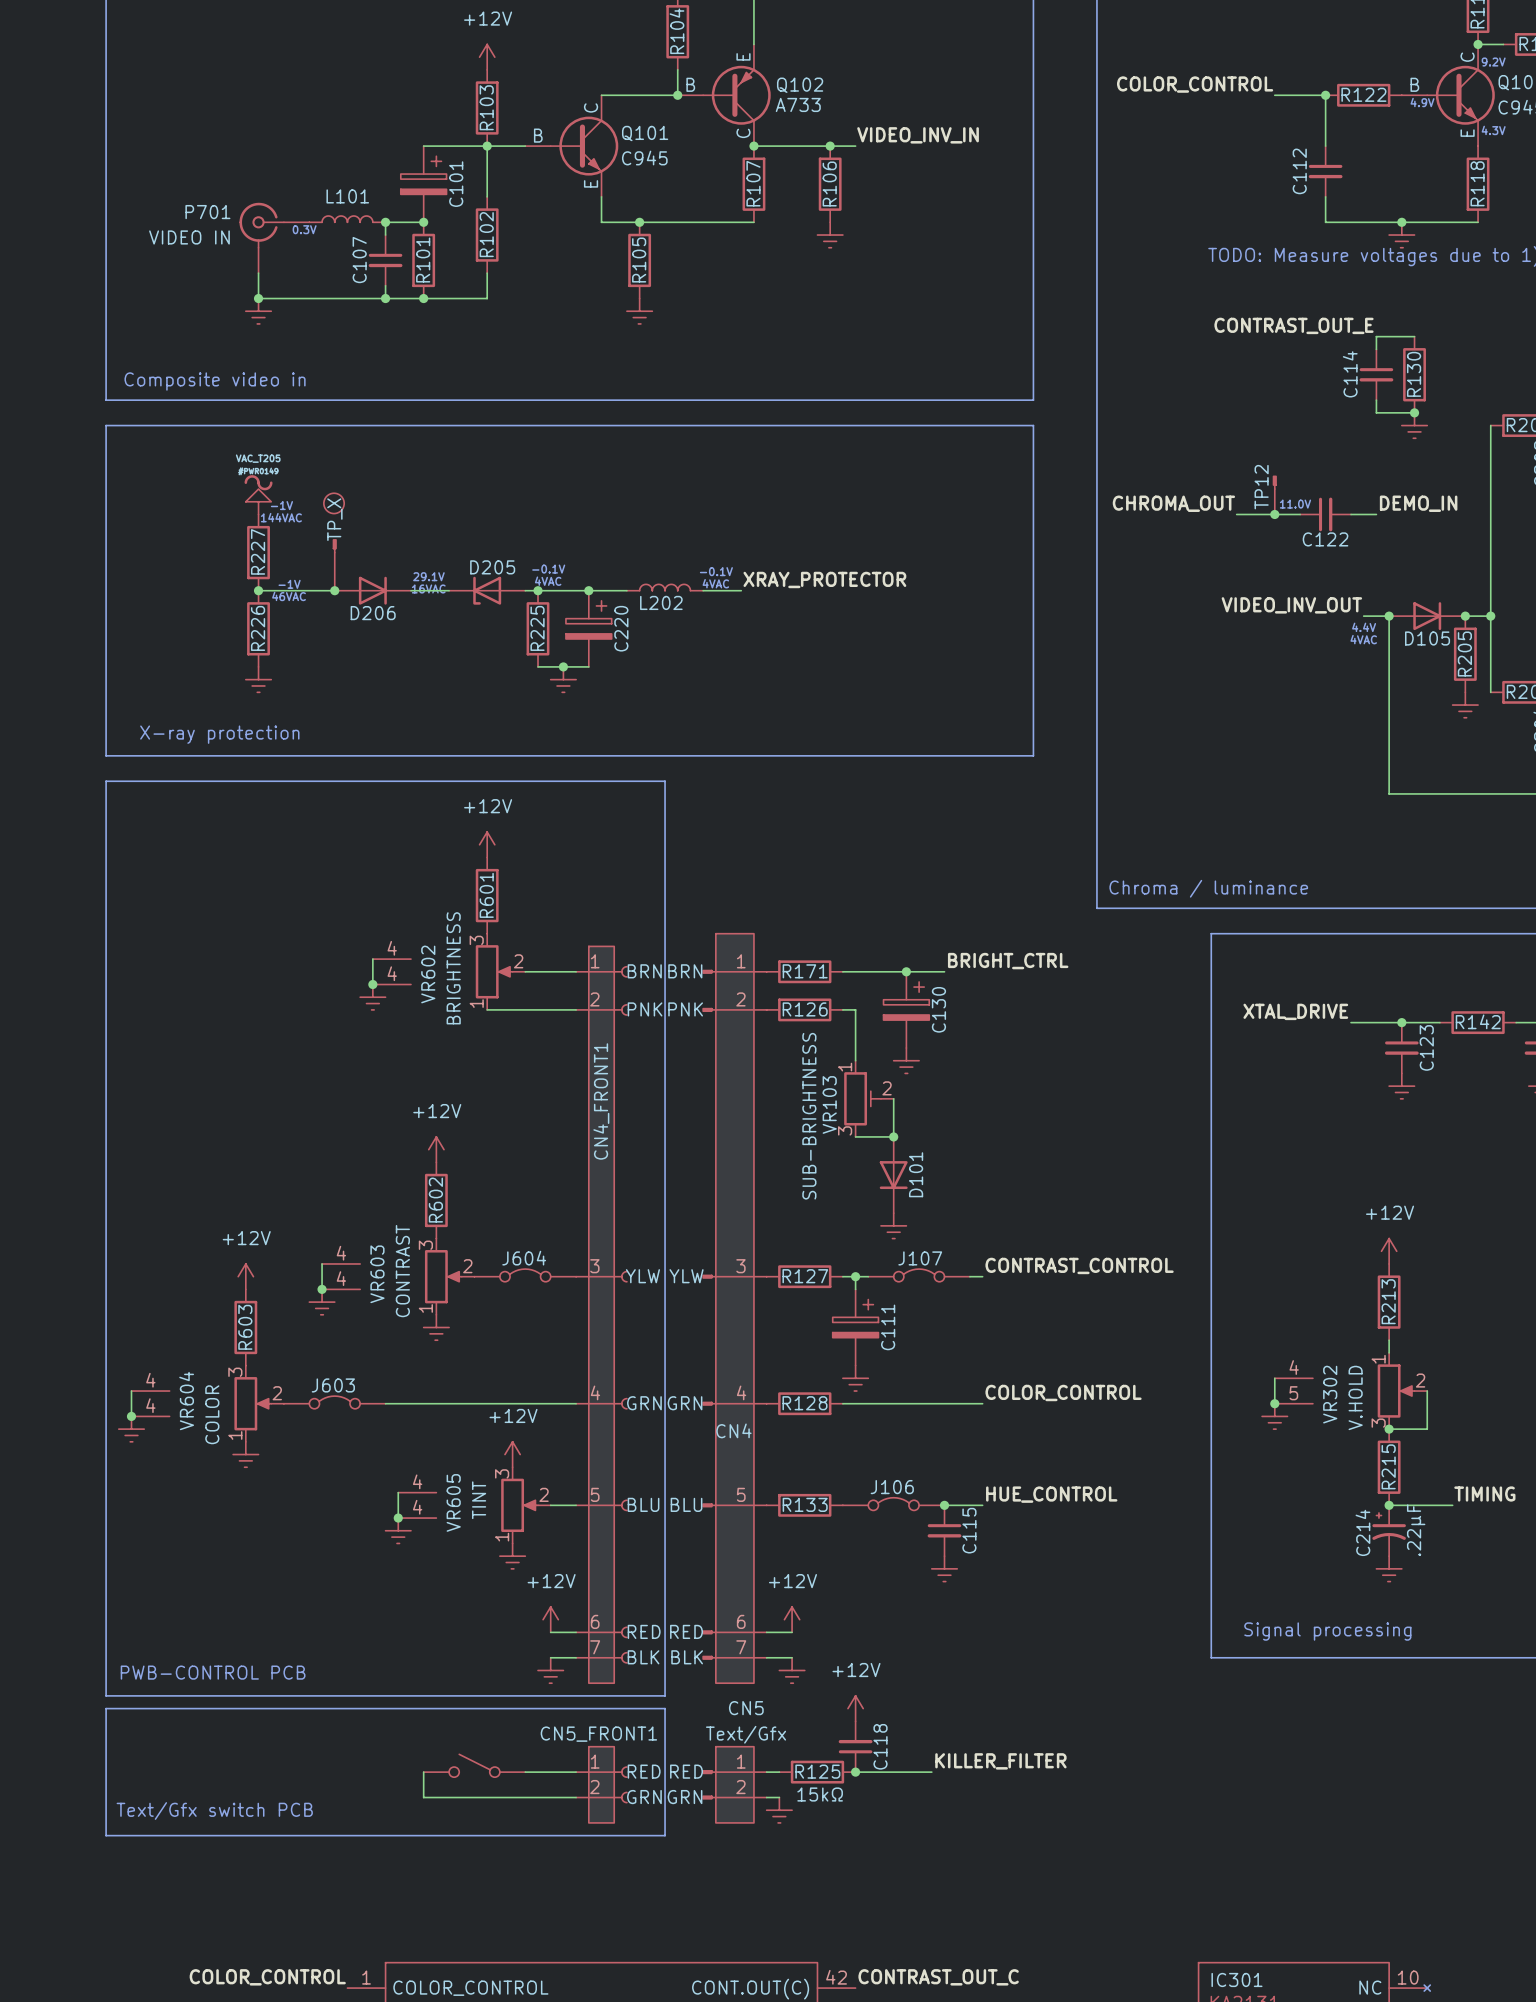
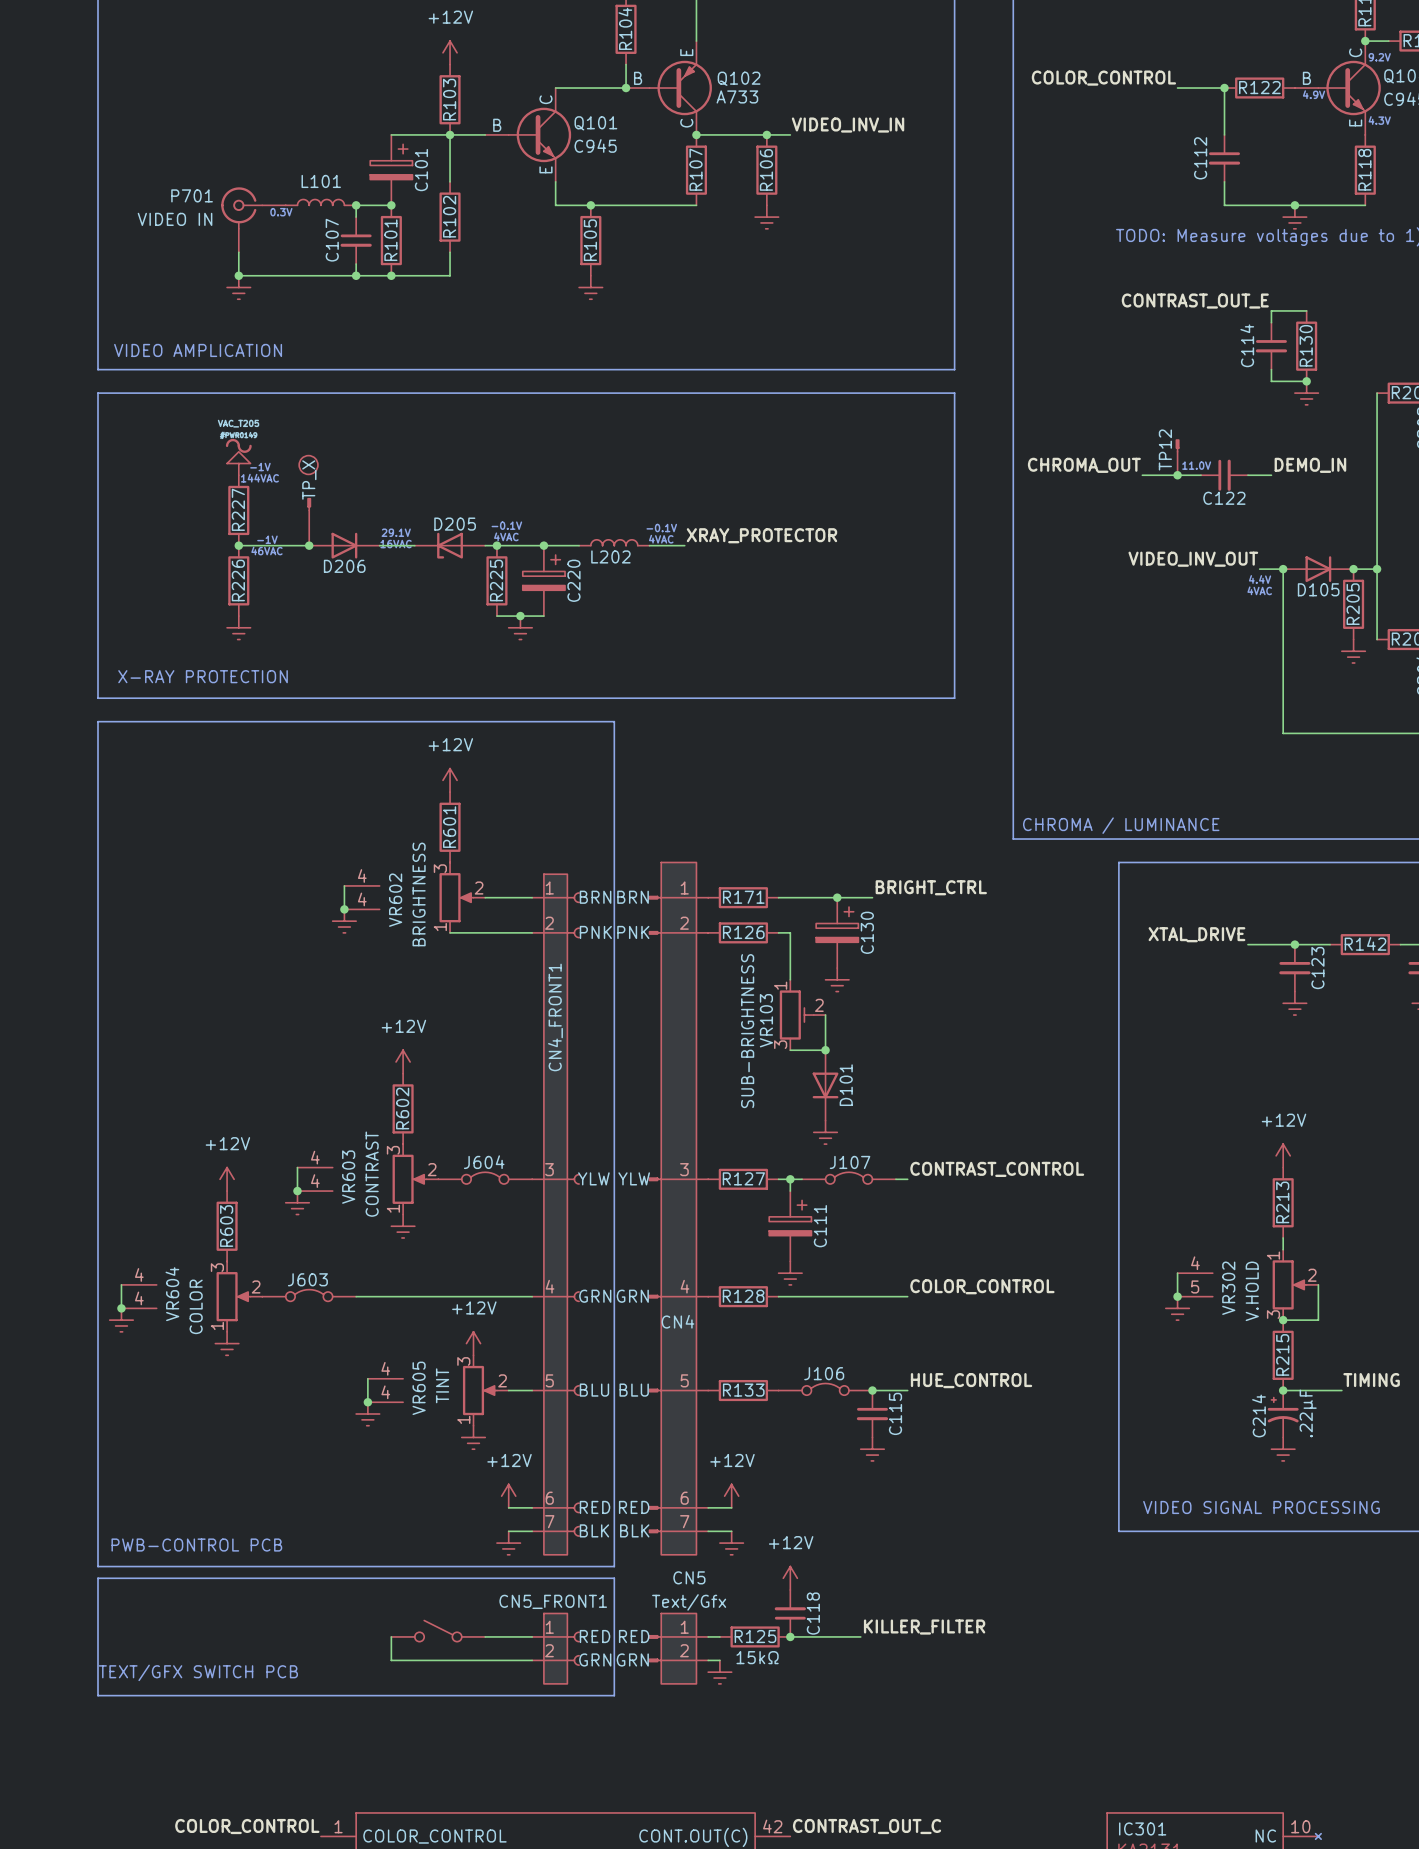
text: Composite video in (215, 381) -> VIDEO AMPLICATION (198, 350)
text: X-ray protection (219, 734) -> X-RAY PROTECTION (203, 676)
text: Chroma / luminance (1208, 888) -> CHROMA / LUMINANCE (1121, 825)
text: Signal processing (1327, 1631) -> none
text: none -> VIDEO SIGNAL PROCESSING (1261, 1507)
text: Text/Gfx switch PCB (214, 1811) -> TEXT/GFX SWITCH PCB (198, 1672)

